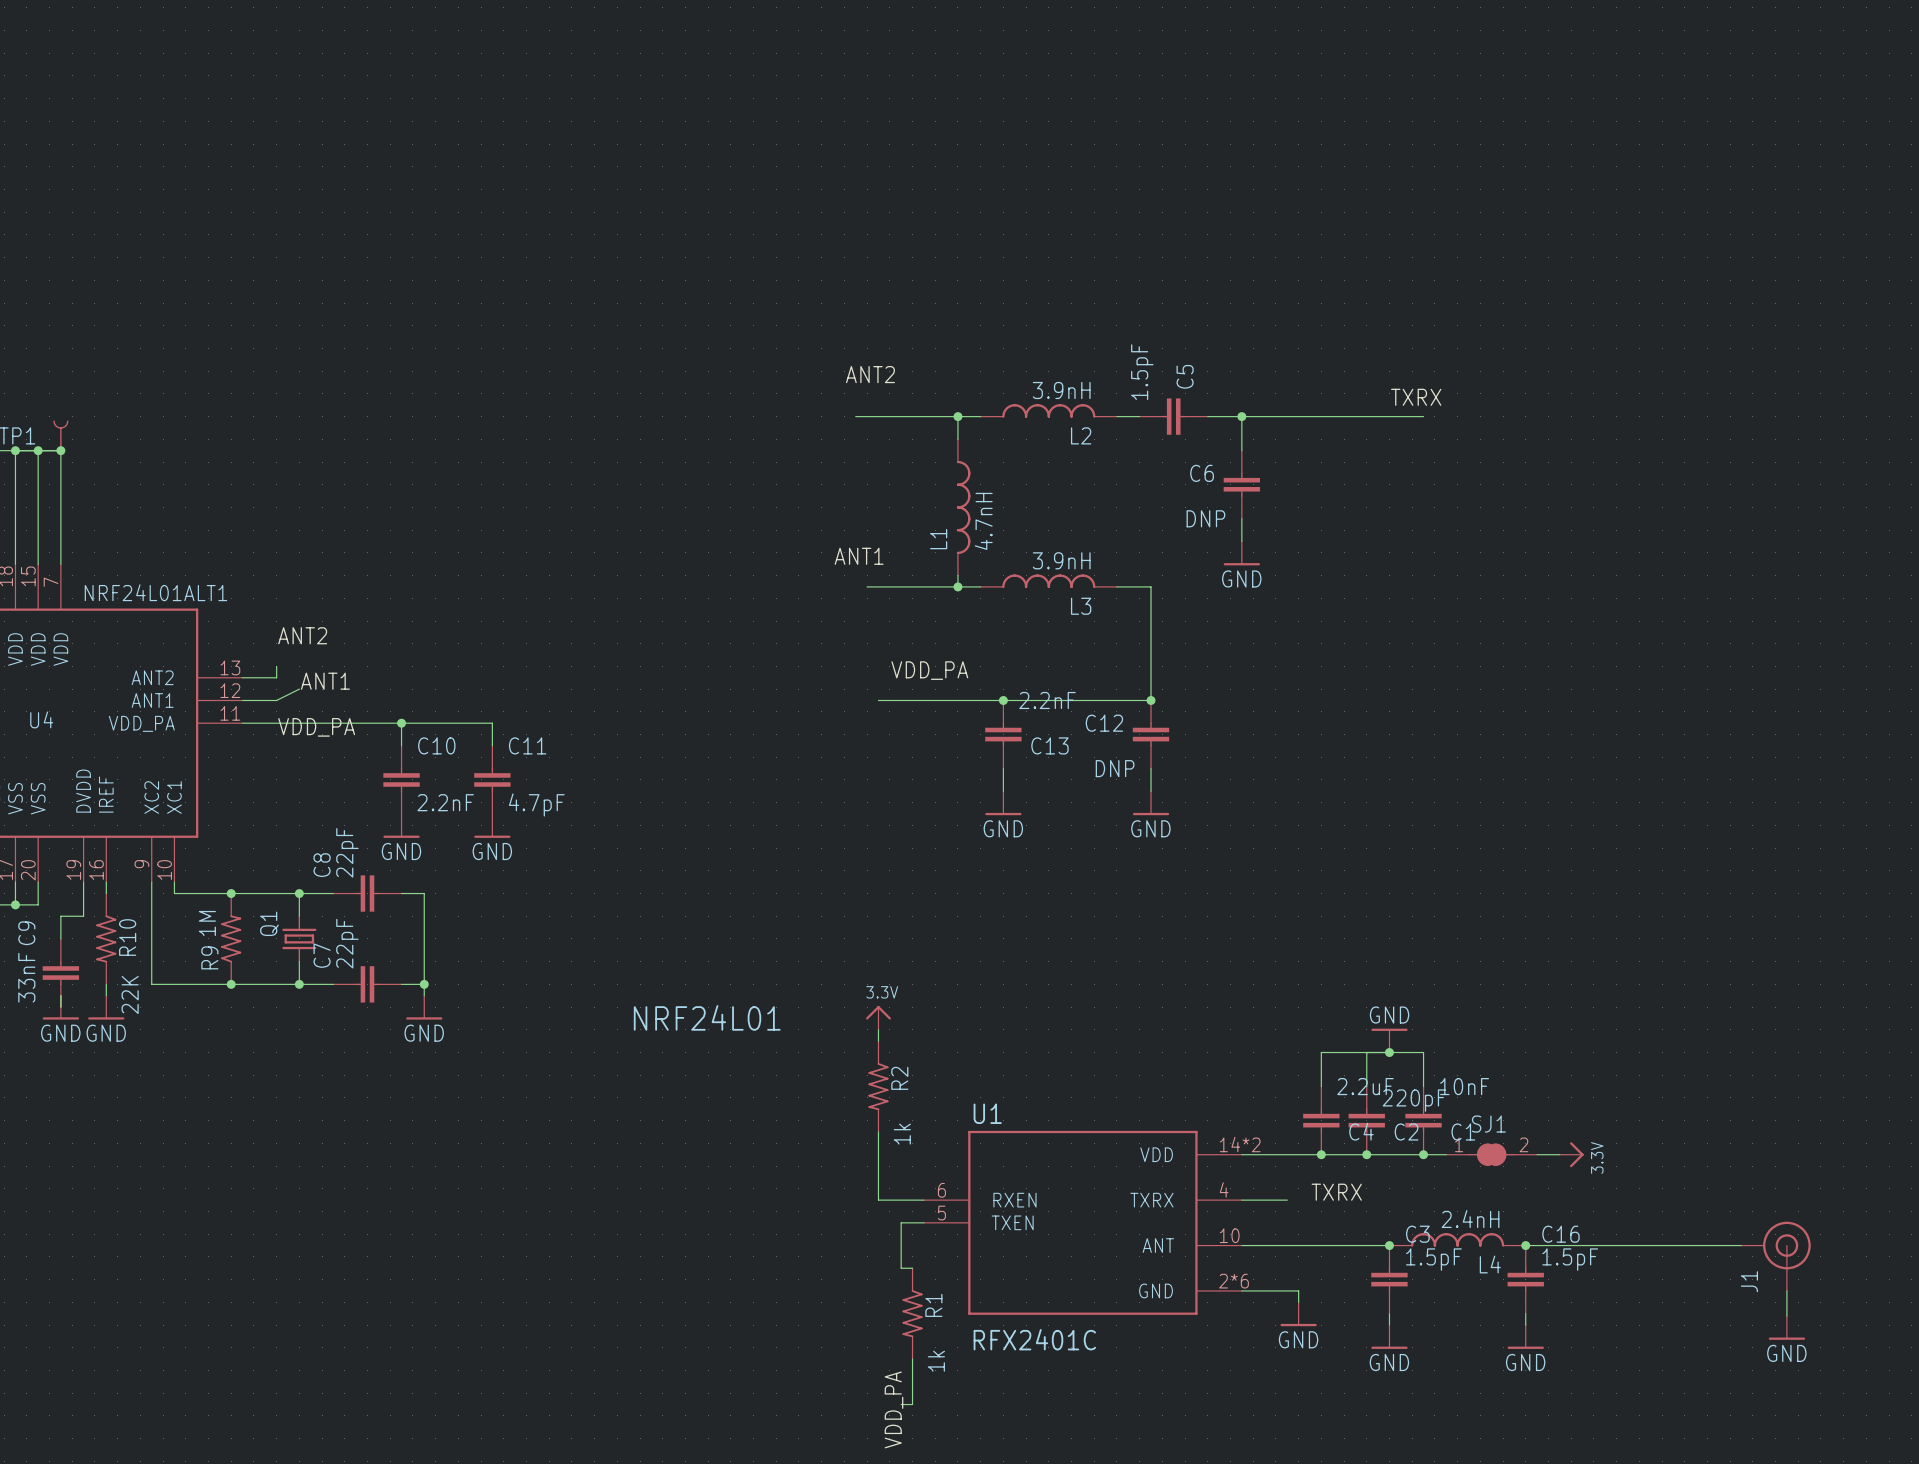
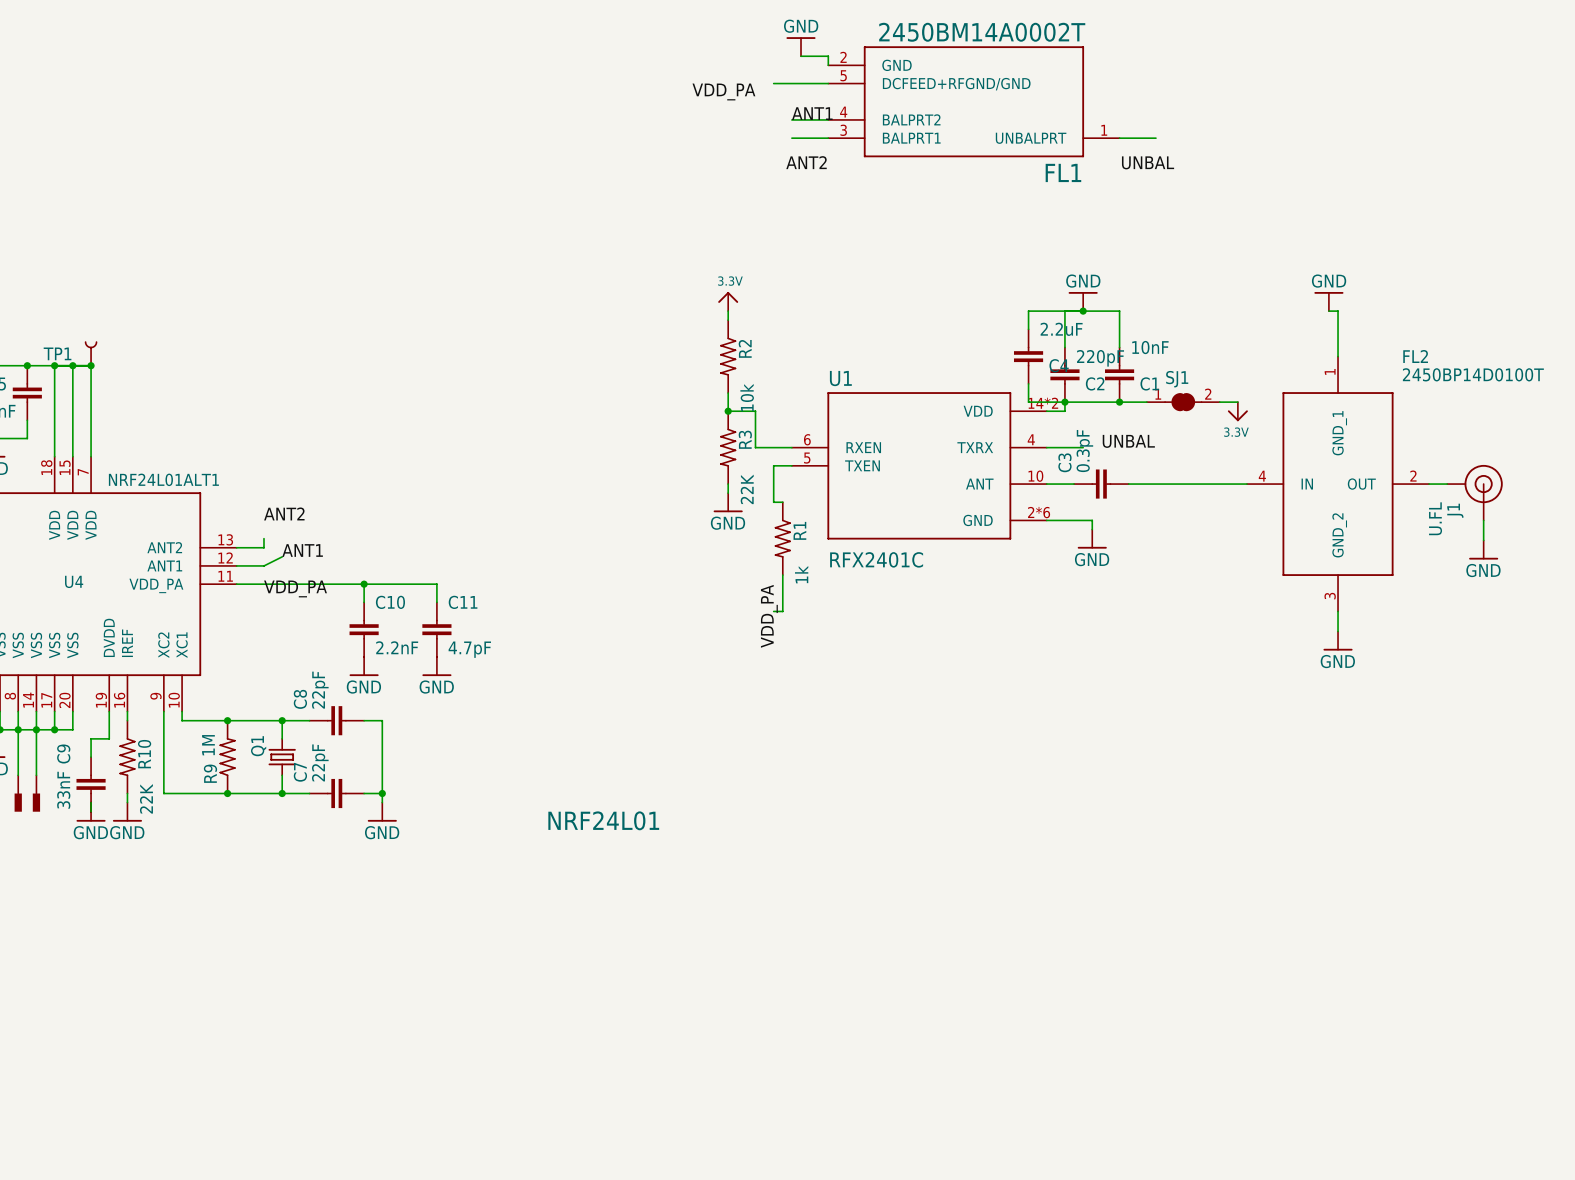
power symbol: none -> GND (801, 46)
wire: none -> (801, 56) (828, 56) (828, 65)
wire: none -> (773, 83) (828, 83)
label: none -> VDD_PA (723, 91)
FL1: none -> 2450BM14A0002T (973, 101)
label: none -> ANT1 (812, 113)
wire: none -> (791, 119) (828, 119)
wire: none -> (791, 138) (828, 138)
wire: none -> (1119, 138) (1155, 138)
label: none -> ANT2 (806, 162)
label: none -> UNBAL (1148, 162)
power symbol: none -> 3.3V (728, 301)
power symbol: none -> GND (1083, 301)
power symbol: none -> GND (1328, 301)
label: ANT2 (870, 374) -> none
wire: none -> (728, 311) (728, 320)
wire: none -> (1064, 311) (1064, 347)
junction: none -> (1083, 311)
wire: none -> (1328, 311) (1338, 311) (1338, 356)
label: TXRX (1416, 397) -> none
wire: none -> (1028, 329) (1028, 311) (1119, 311) (1119, 347)
L2: 3.9nH (1048, 410) -> none
wire: (855, 416) (980, 416) -> none
wire: (957, 416) (957, 439) -> none
junction: (957, 416) -> none
wire: (1116, 416) (1139, 416) -> none
C5: 1.5pF (1173, 416) -> none
wire: (1207, 416) (1423, 416) -> none
wire: (1241, 416) (1241, 450) -> none
junction: (1241, 416) -> none
wire: none -> (1028, 383) (1028, 402) (1146, 402)
wire: none -> (728, 393) (728, 411) (755, 411) (755, 447) (791, 447)
C6: DNP (1241, 484) -> none
wire: none -> (1064, 402) (1064, 411) (1046, 411)
junction: none -> (1064, 402)
junction: none -> (1119, 402)
wire: none -> (1219, 402) (1237, 402)
junction: none -> (728, 411)
L1: 4.7nH (963, 507) -> none
power symbol: none -> 3.3V (1237, 411)
wire: (1241, 518) (1241, 541) -> none
label: none -> UNBAL (1128, 441)
R3: none -> 22K (728, 447)
wire: none -> (1046, 447) (1083, 447)
power symbol: GND (1241, 553) -> none
label: ANT1 (859, 556) -> none
wire: none -> (791, 465) (773, 465) (773, 502) (782, 502)
wire: (957, 575) (957, 586) -> (728, 484) (728, 493)
L3: 3.9nH (1048, 581) -> none
wire: (867, 586) (980, 586) -> none
junction: (957, 586) -> none
wire: (1116, 586) (1151, 586) (1151, 700) (878, 700) -> none
wire: none -> (1046, 484) (1074, 484)
wire: none -> (1128, 484) (1247, 484)
FL2: none -> 2450BP14D0100T (1338, 484)
wire: none -> (1429, 484) (1447, 484)
power symbol: none -> GND (728, 502)
wire: none -> (1046, 520) (1092, 520) (1092, 529)
J1 value: none -> U.FL (1435, 518)
wire: none -> (1483, 520) (1483, 540)
power symbol: none -> GND (1092, 539)
label rotation: 0° (929, 670) -> 90° counterclockwise (769, 616)
power symbol: none -> GND (1483, 550)
junction: (1003, 700) -> none
junction: (1151, 700) -> none
wire: none -> (782, 575) (782, 611) (773, 611)
C13: 2.2nF (1003, 734) -> none
C12: DNP (1151, 734) -> none
wire: none -> (1338, 611) (1338, 631)
wire: (1003, 768) (1003, 791) -> none
wire: (1151, 768) (1151, 791) -> none
power symbol: none -> GND (1338, 641)
power symbol: GND (1003, 803) -> none
power symbol: GND (1151, 803) -> none
power symbol: 3.3V (878, 1017) -> none
wire: (878, 1029) (878, 1041) -> none
power symbol: GND (1389, 1040) -> none
wire: (1366, 1052) (1366, 1086) -> none
junction: (1389, 1052) -> none
R2 position: (878, 1086) -> (728, 356)
wire: (1321, 1086) (1321, 1052) (1423, 1052) (1423, 1086) -> none
C4 position: (1321, 1120) -> (1028, 356)
C2 position: (1366, 1120) -> (1064, 374)
C1 position: (1423, 1120) -> (1119, 374)
wire: (878, 1132) (878, 1200) (923, 1200) -> none
R2 value: 1k (902, 1134) -> 10k (747, 397)
wire: (1241, 1154) (1446, 1154) -> none
junction: (1321, 1154) -> none
junction: (1366, 1154) -> none
junction: (1423, 1154) -> none
SJ1 position: (1491, 1154) -> (1183, 402)
wire: (1537, 1154) (1559, 1154) -> none
power symbol: 3.3V (1571, 1154) -> none
label: TXRX (1336, 1192) -> none
wire: (1241, 1200) (1287, 1200) -> none
wire: (923, 1222) (901, 1222) (901, 1268) (912, 1268) -> none
U1 position: (1082, 1222) -> (919, 465)
C3 name position: C3 (1417, 1234) -> C3 (1064, 462)
L4: 2.4nH (1457, 1239) -> none
wire: (1241, 1245) (1389, 1245) -> none
junction: (1389, 1245) -> none
wire: (1525, 1245) (1741, 1245) -> none
junction: (1525, 1245) -> none
J1 position: (1776, 1256) -> (1475, 492)
C3 value: 1.5pF (1433, 1259) -> 0.3pF (1084, 451)
C3 rotation: 0° (1389, 1279) -> 90° clockwise (1101, 484)
C3 position: (1389, 1279) -> (1101, 484)
C16: 1.5pF (1525, 1279) -> none
wire: (1241, 1290) (1298, 1290) (1298, 1302) -> none
wire: (1786, 1290) (1786, 1315) -> none
R1 position: (912, 1313) -> (782, 538)
wire: (1389, 1313) (1389, 1325) -> none
wire: (1525, 1313) (1525, 1325) -> none
power symbol: GND (1298, 1314) -> none
power symbol: GND (1786, 1327) -> none
power symbol: GND (1389, 1336) -> none
power symbol: GND (1525, 1336) -> none
wire: (912, 1359) (912, 1404) (901, 1404) -> none
label: VDD_PA (893, 1409) -> none

